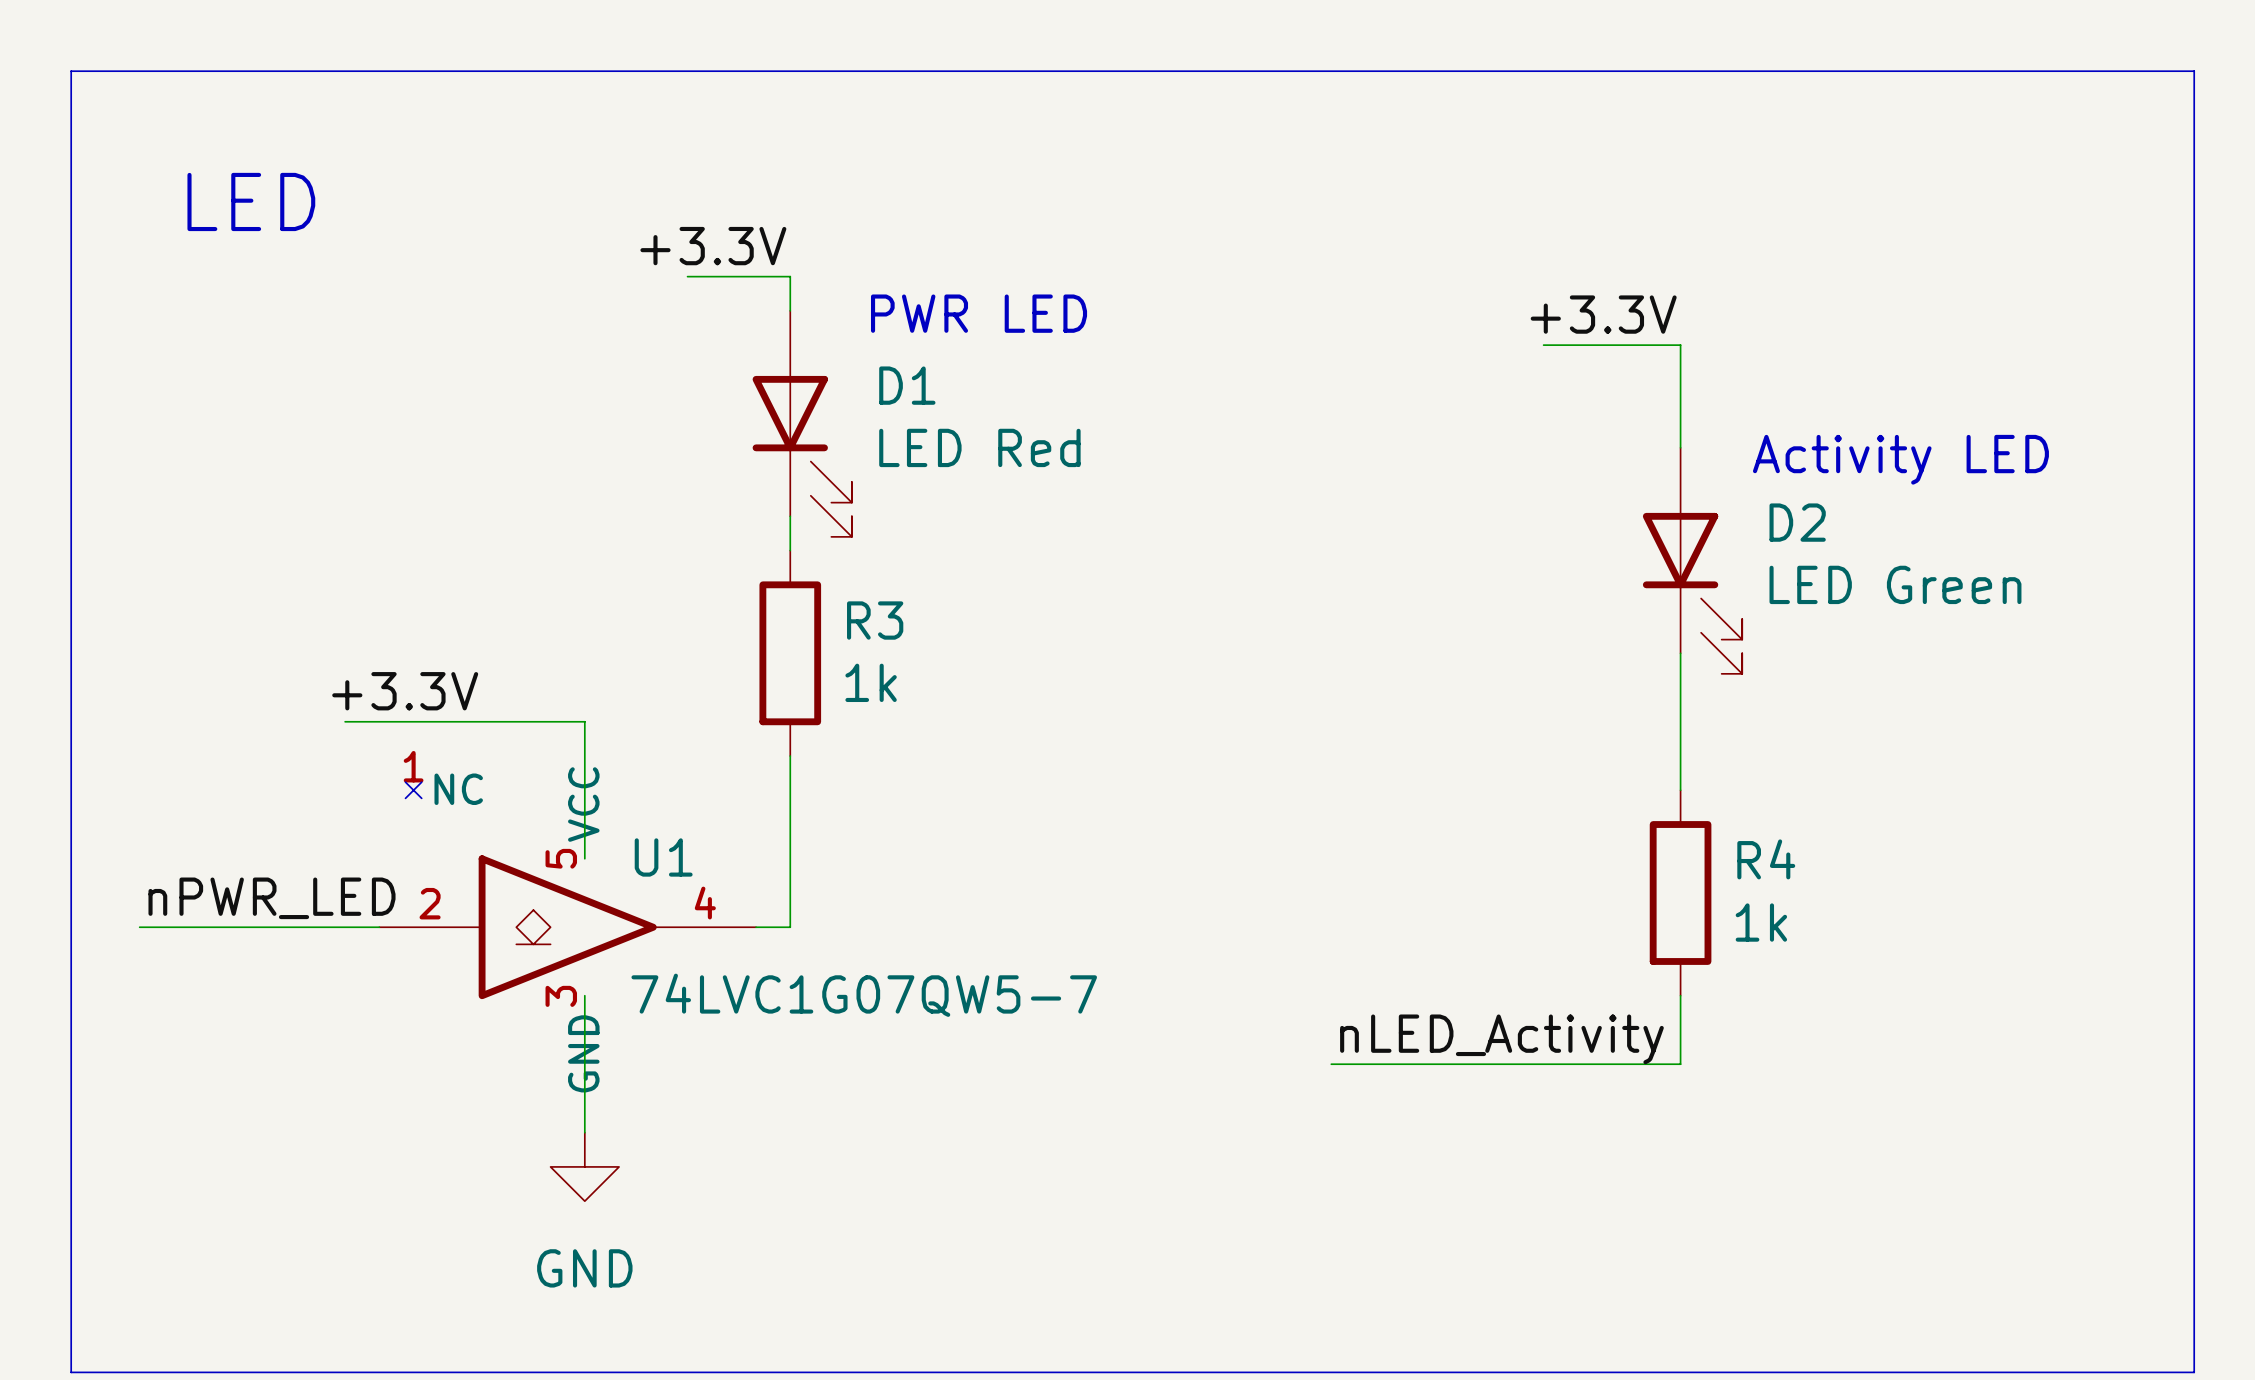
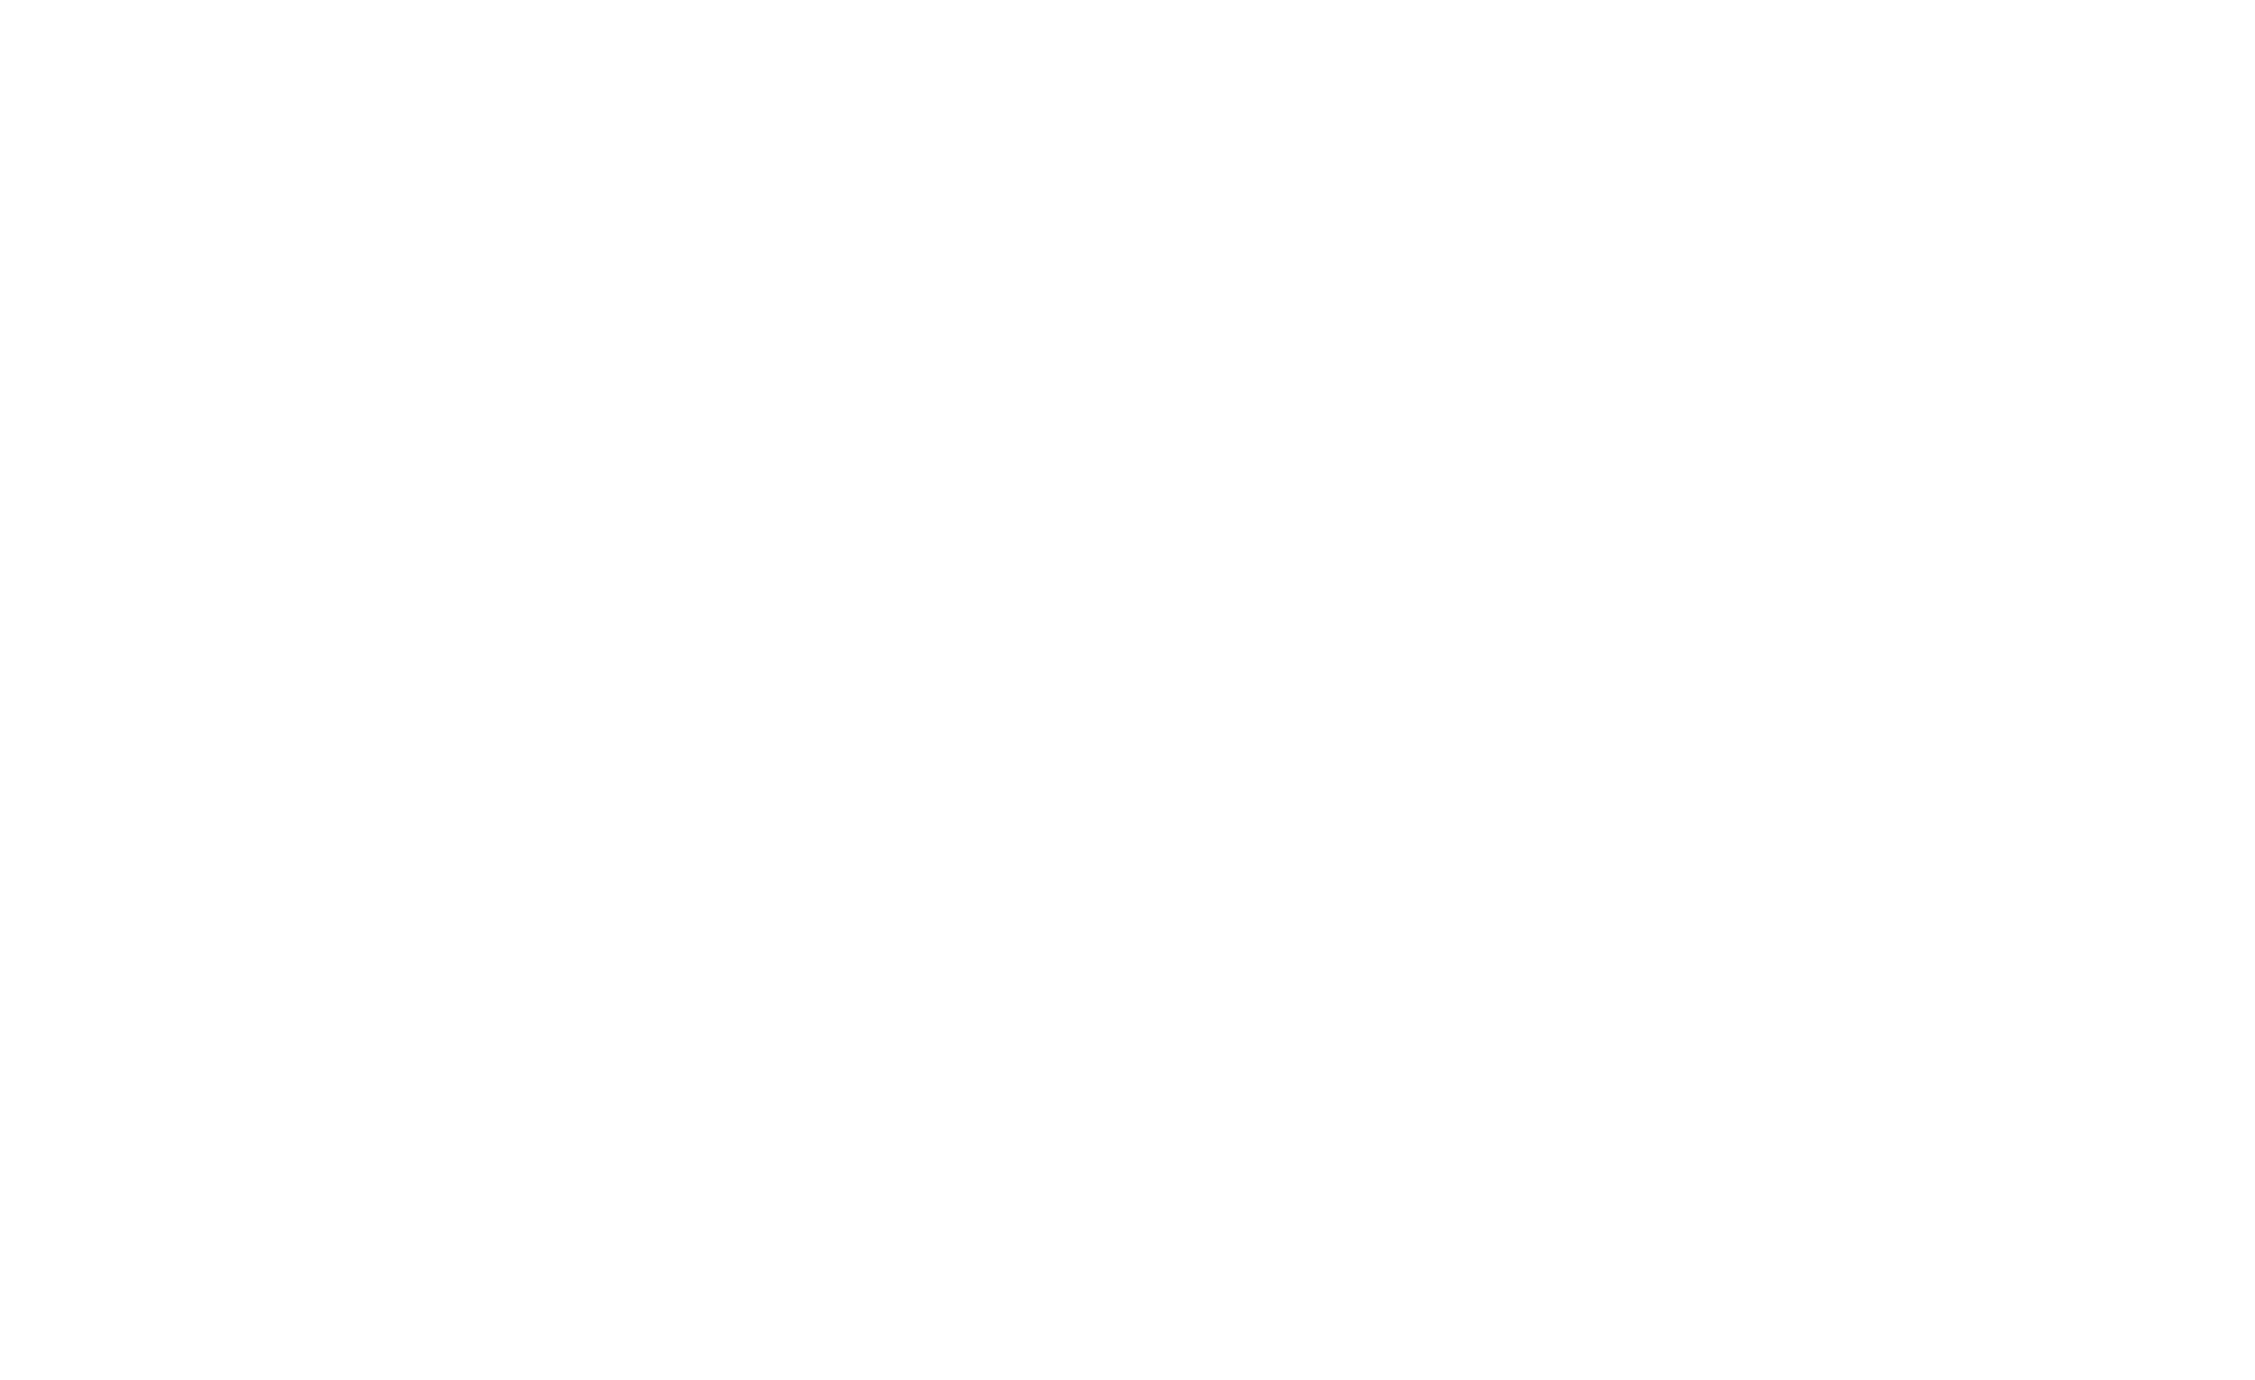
line: (71, 71) (71, 1372) (2194, 1372) (2194, 71) (71, 71) -> none
text: LED (251, 201) -> none
label: +3.3V (713, 246) -> none
wire: (687, 276) (790, 276) (790, 310) -> none
text: PWR LED (979, 313) -> none
label: +3.3V (1603, 314) -> none
wire: (1543, 345) (1680, 345) (1680, 447) -> none
D1: LED Red (802, 423) -> none
text: Activity LED (1900, 459) -> none
wire: (790, 516) (790, 550) -> none
D2: LED Green (1692, 560) -> none
R3: 1k (790, 653) -> none
wire: (1680, 653) (1680, 790) -> none
label: +3.3V (405, 691) -> none
wire: (345, 721) (584, 721) (584, 858) -> none
wire: (790, 756) (790, 927) (756, 927) -> none
U1: 74LVC1G07QW5-7 (567, 890) -> none
R4: 1k (1680, 893) -> none
label: nPWR_LED (272, 898) -> none
wire: (139, 927) (379, 927) -> none
wire: (584, 995) (584, 1132) -> none
wire: (1680, 995) (1680, 1064) (1331, 1064) -> none
label: nLED_Activity (1501, 1039) -> none
power symbol: GND (584, 1166) -> none

